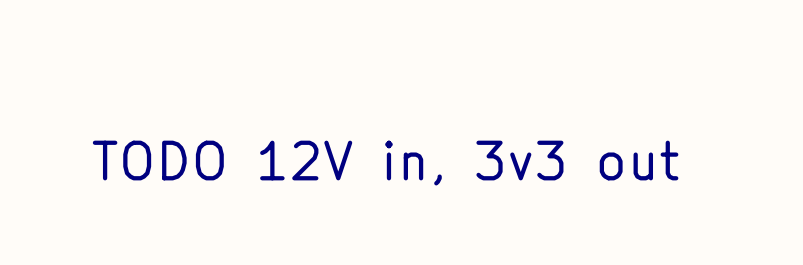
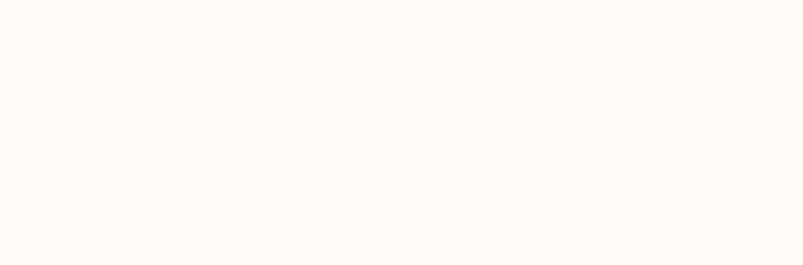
text: TODO 12V in, 3v3 out (385, 163) -> none

